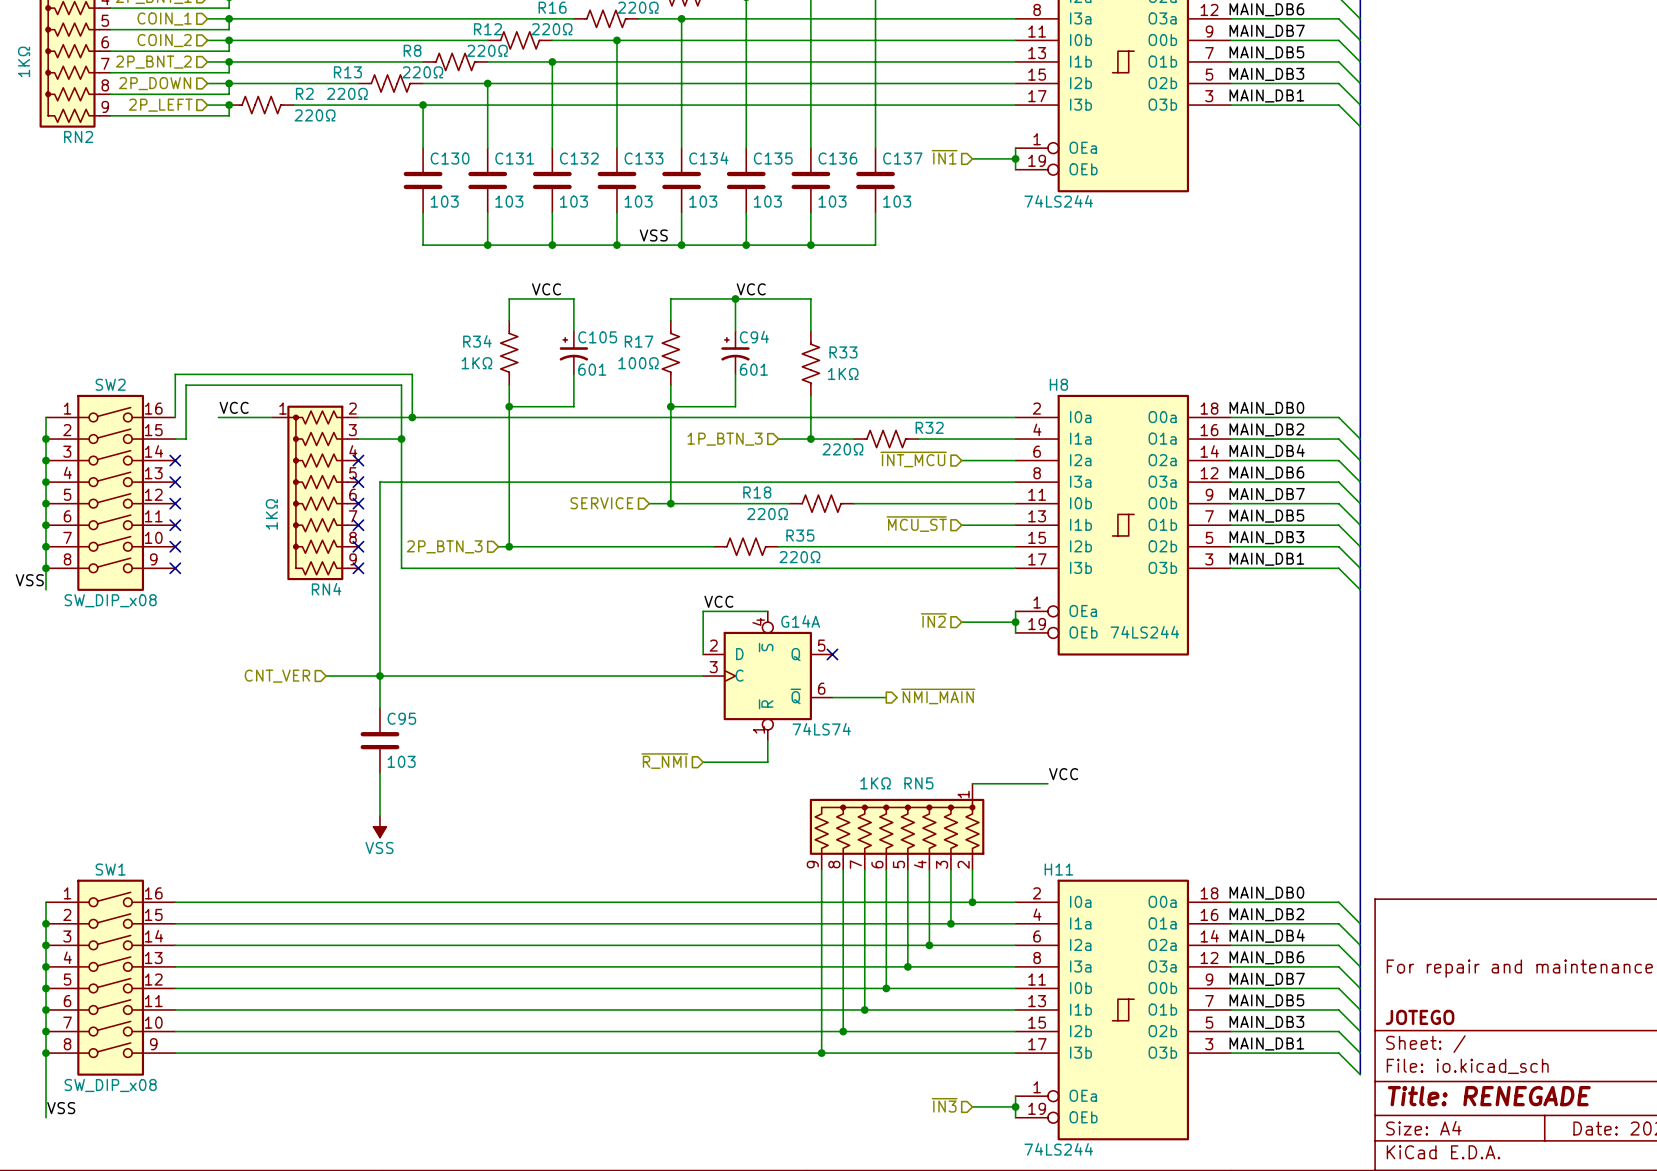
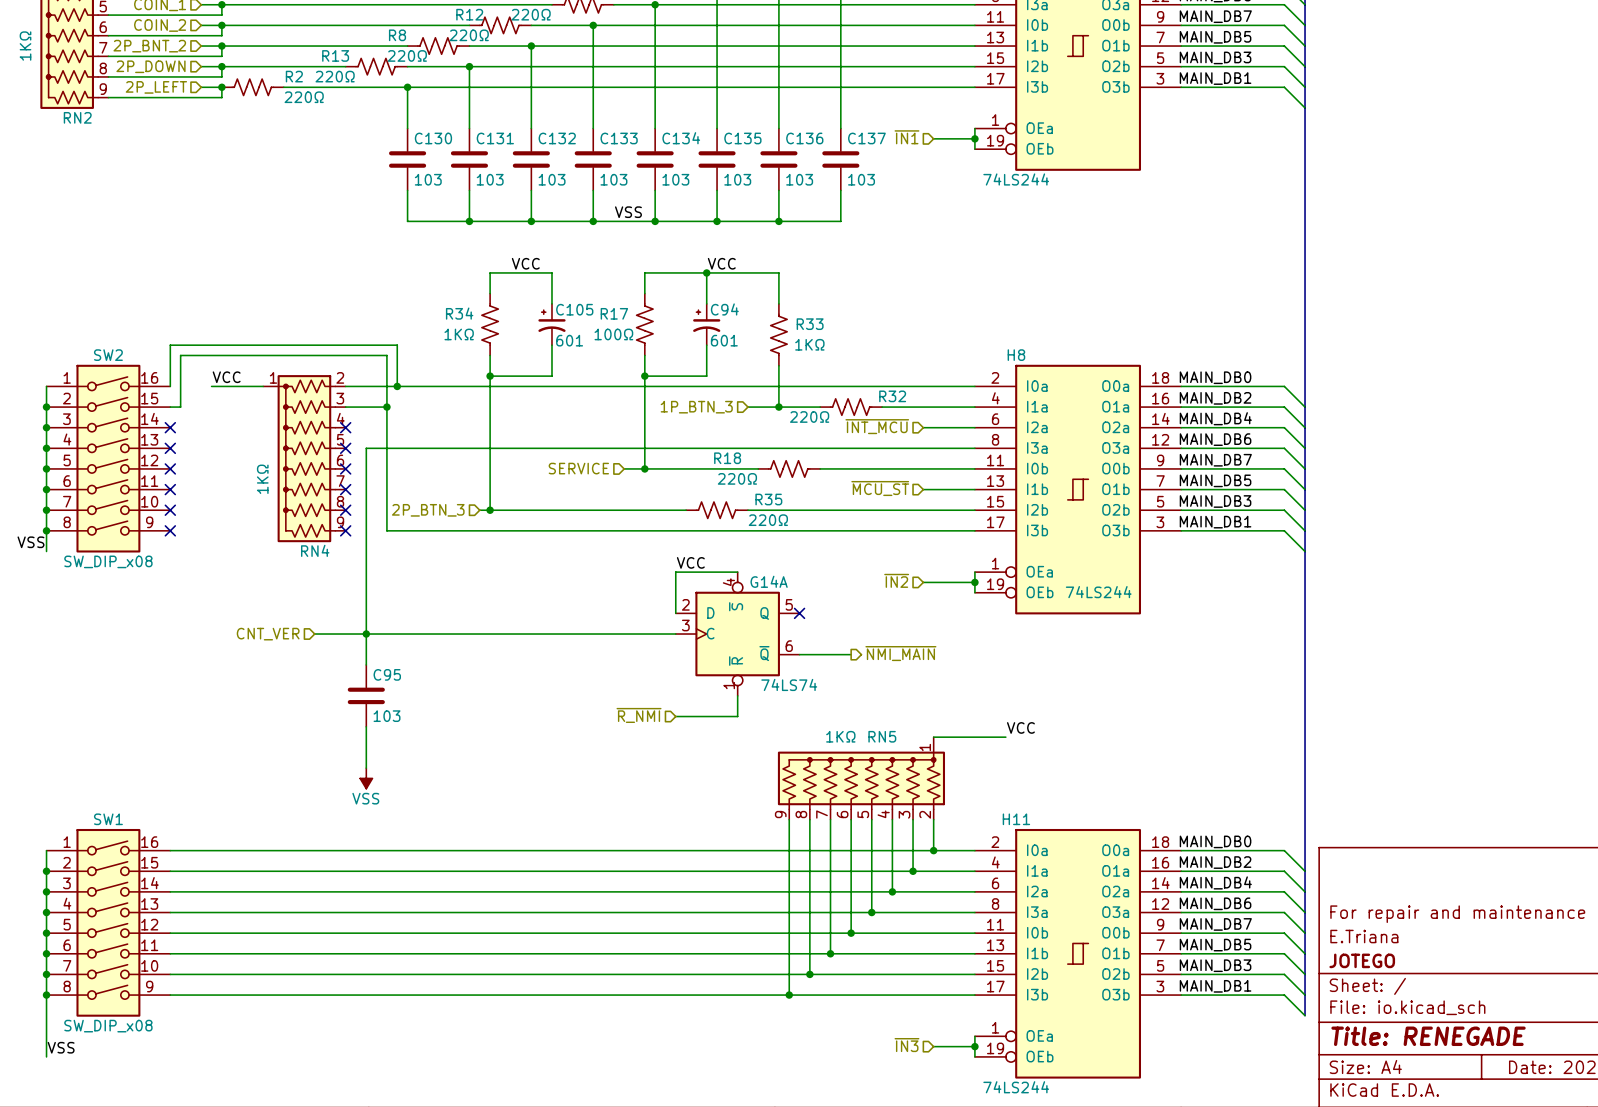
title block: none -> E.Triana (1364, 936)

